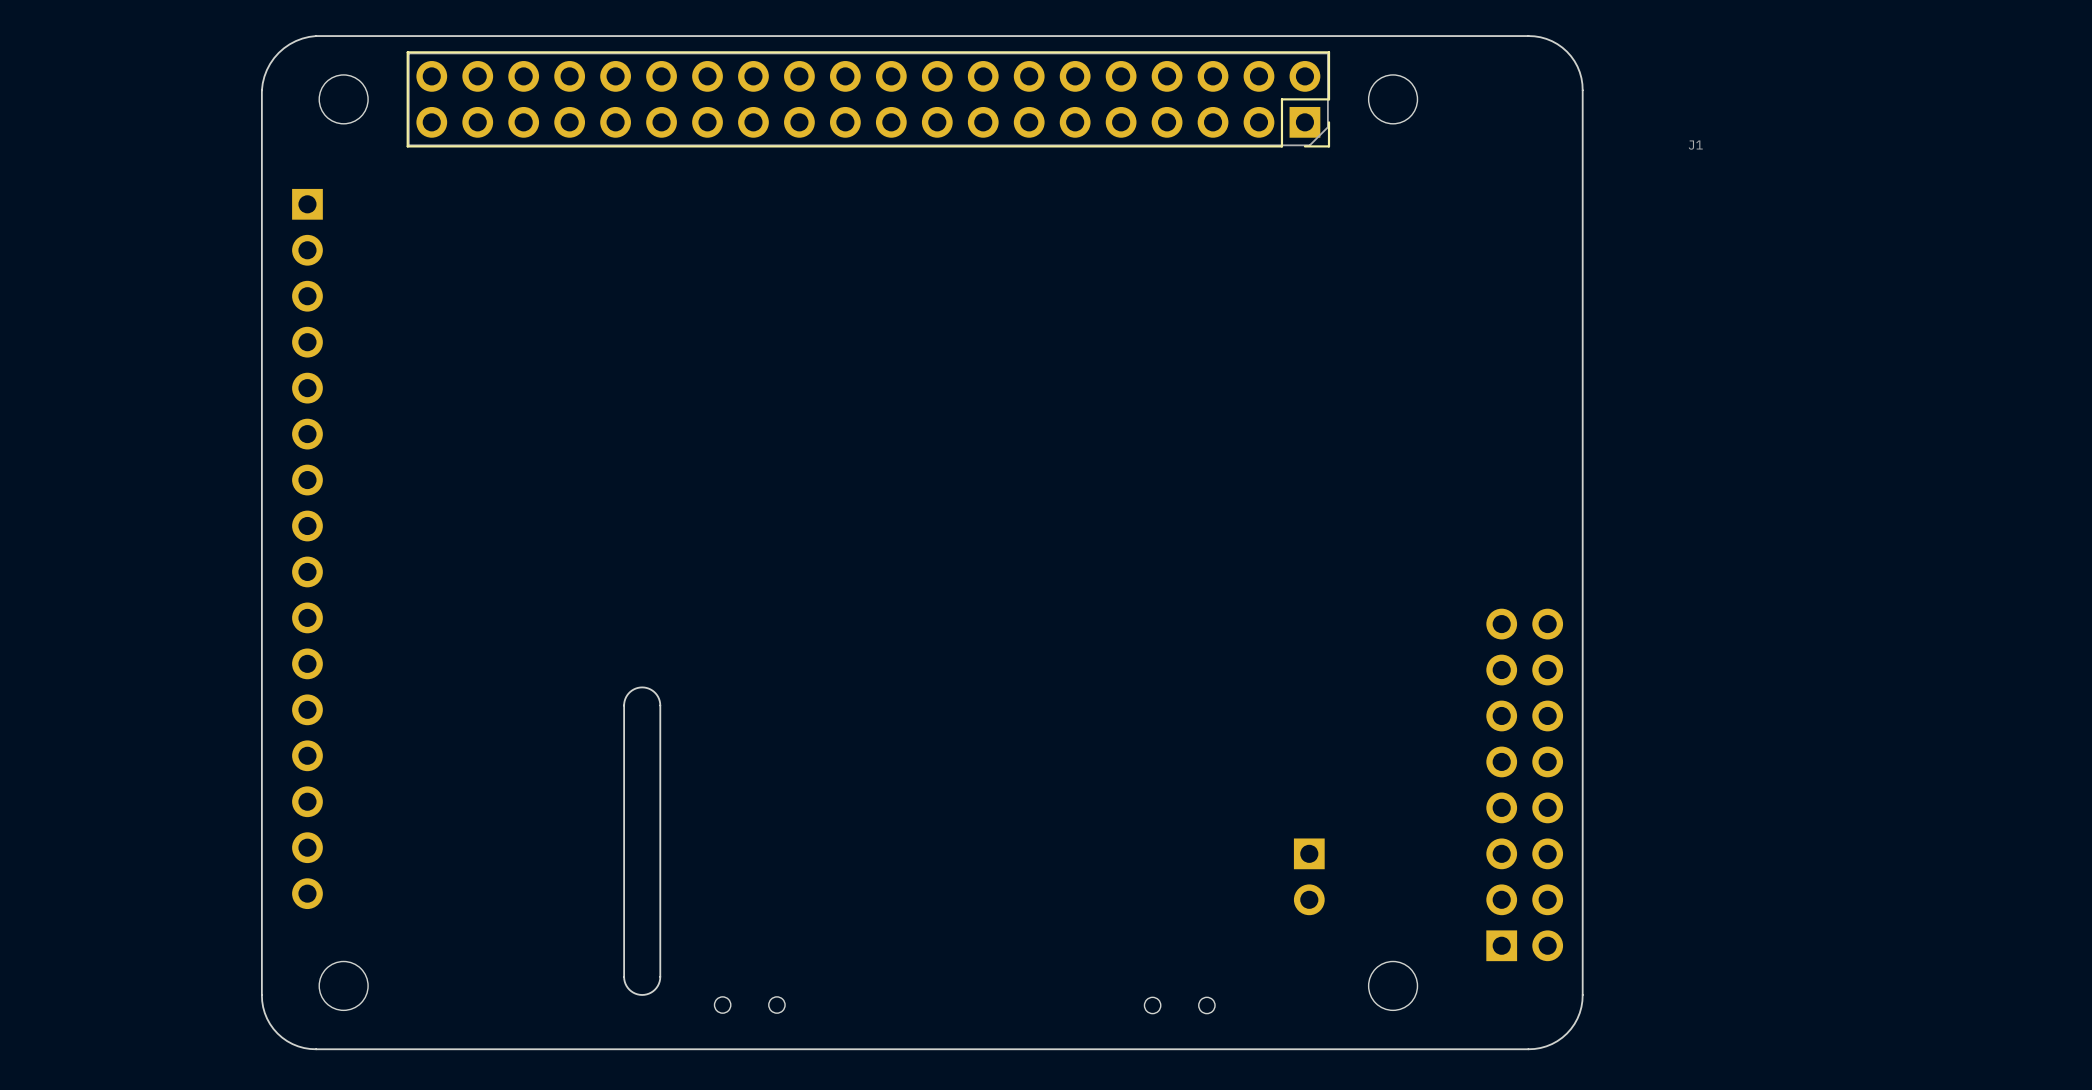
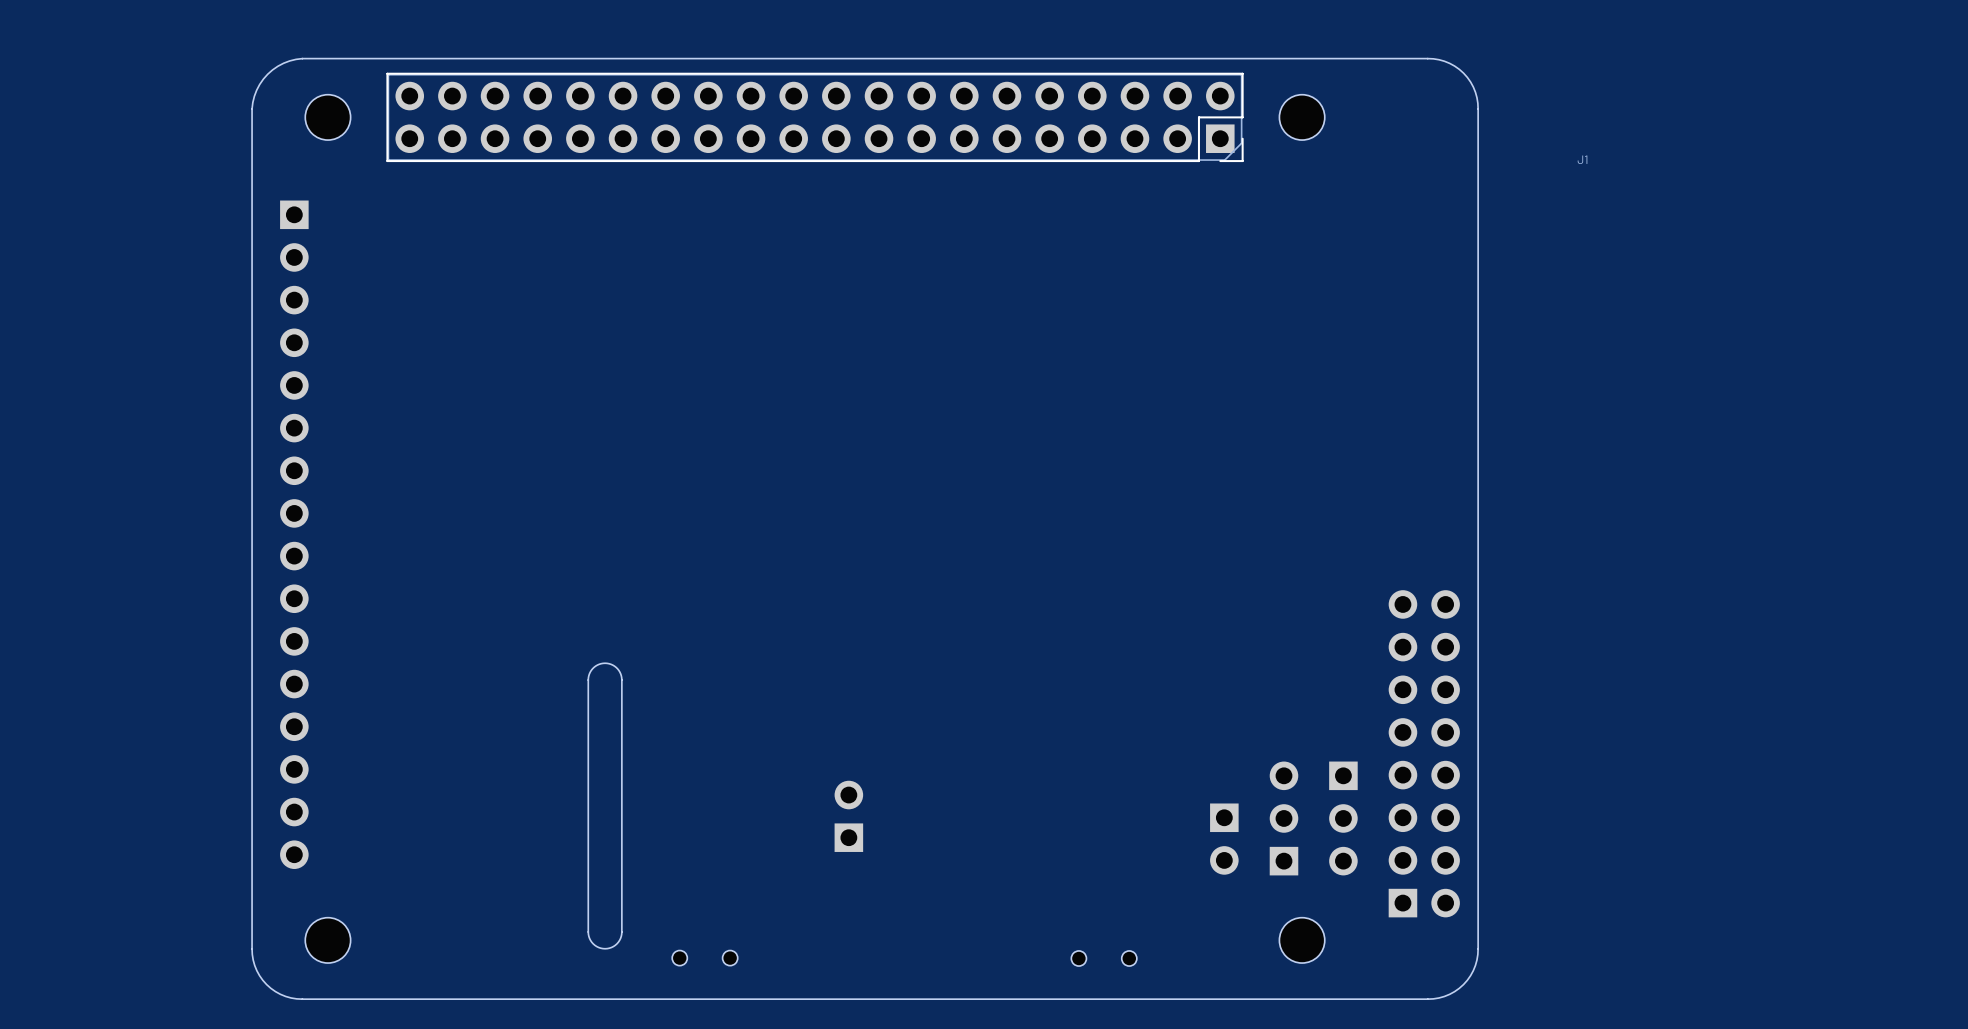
part: none -> (848, 816)
part: none -> (1283, 818)
part: none -> (1343, 818)

